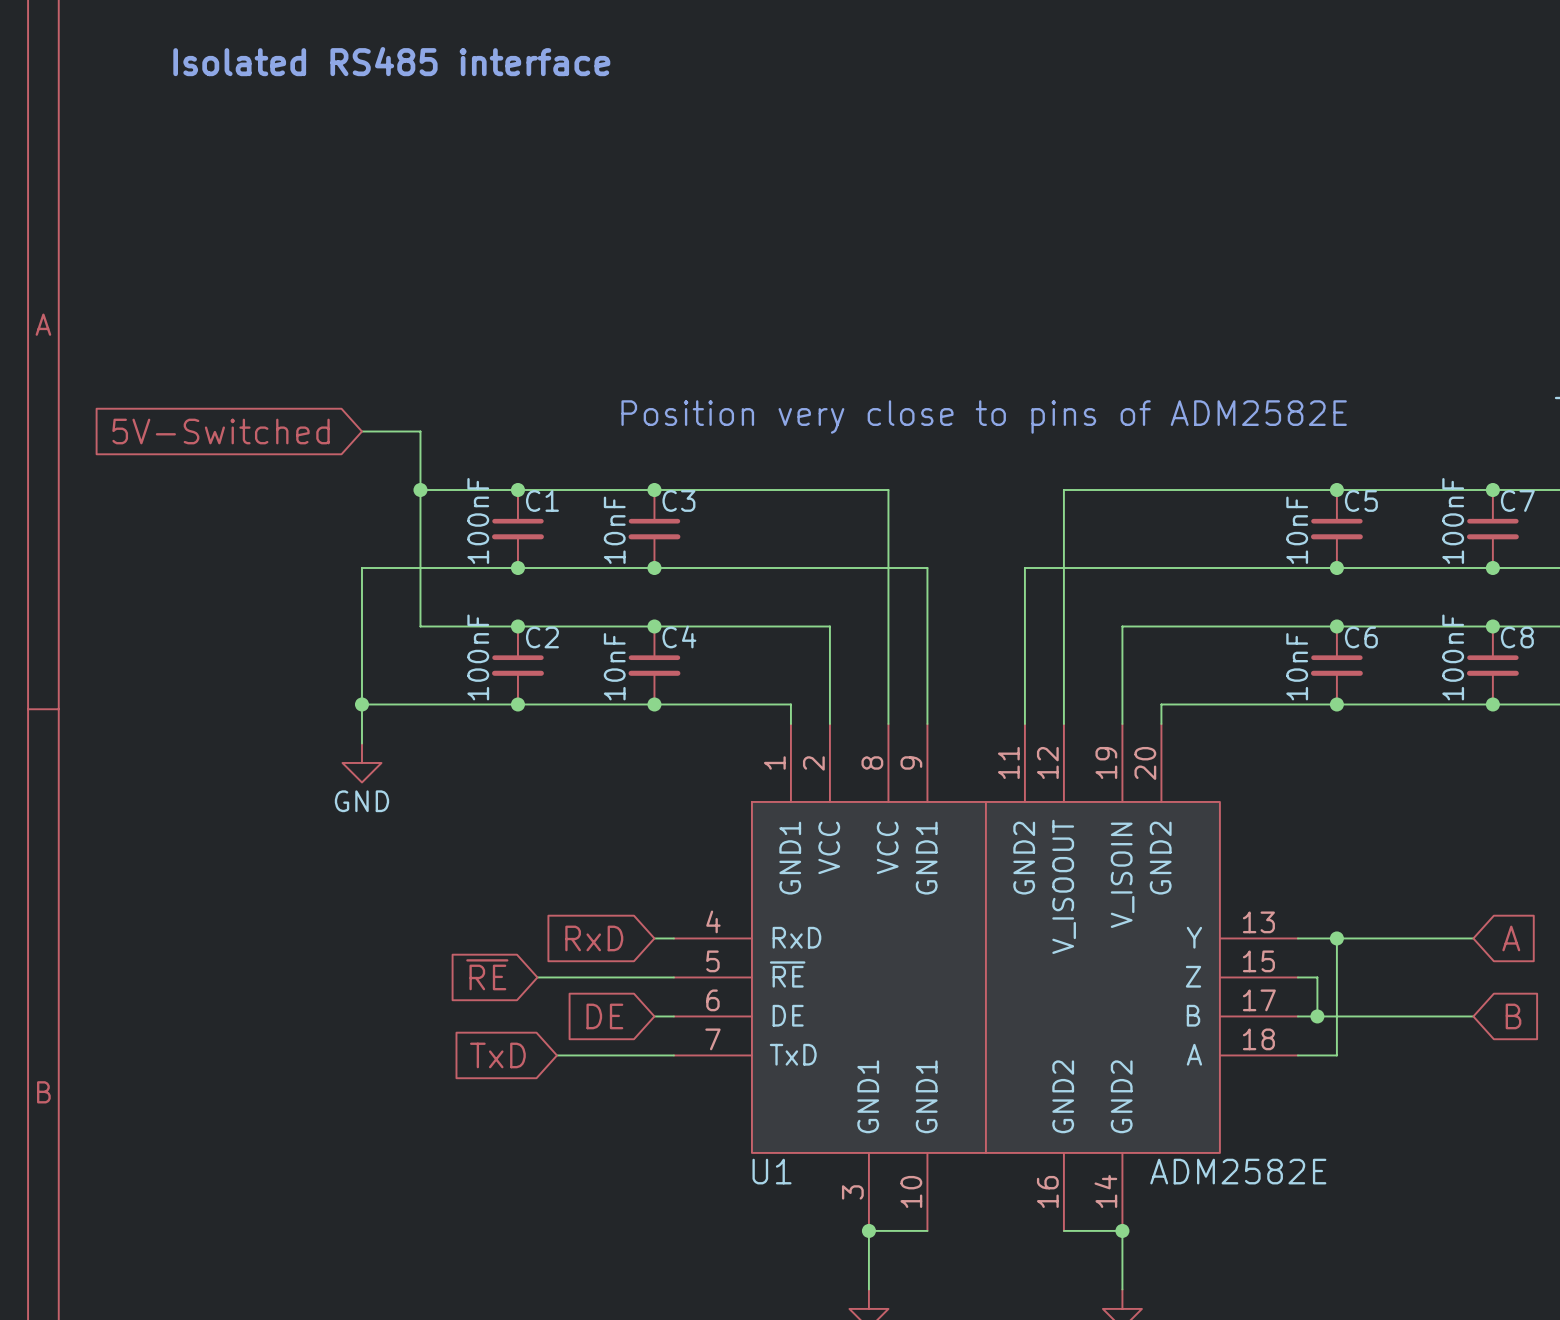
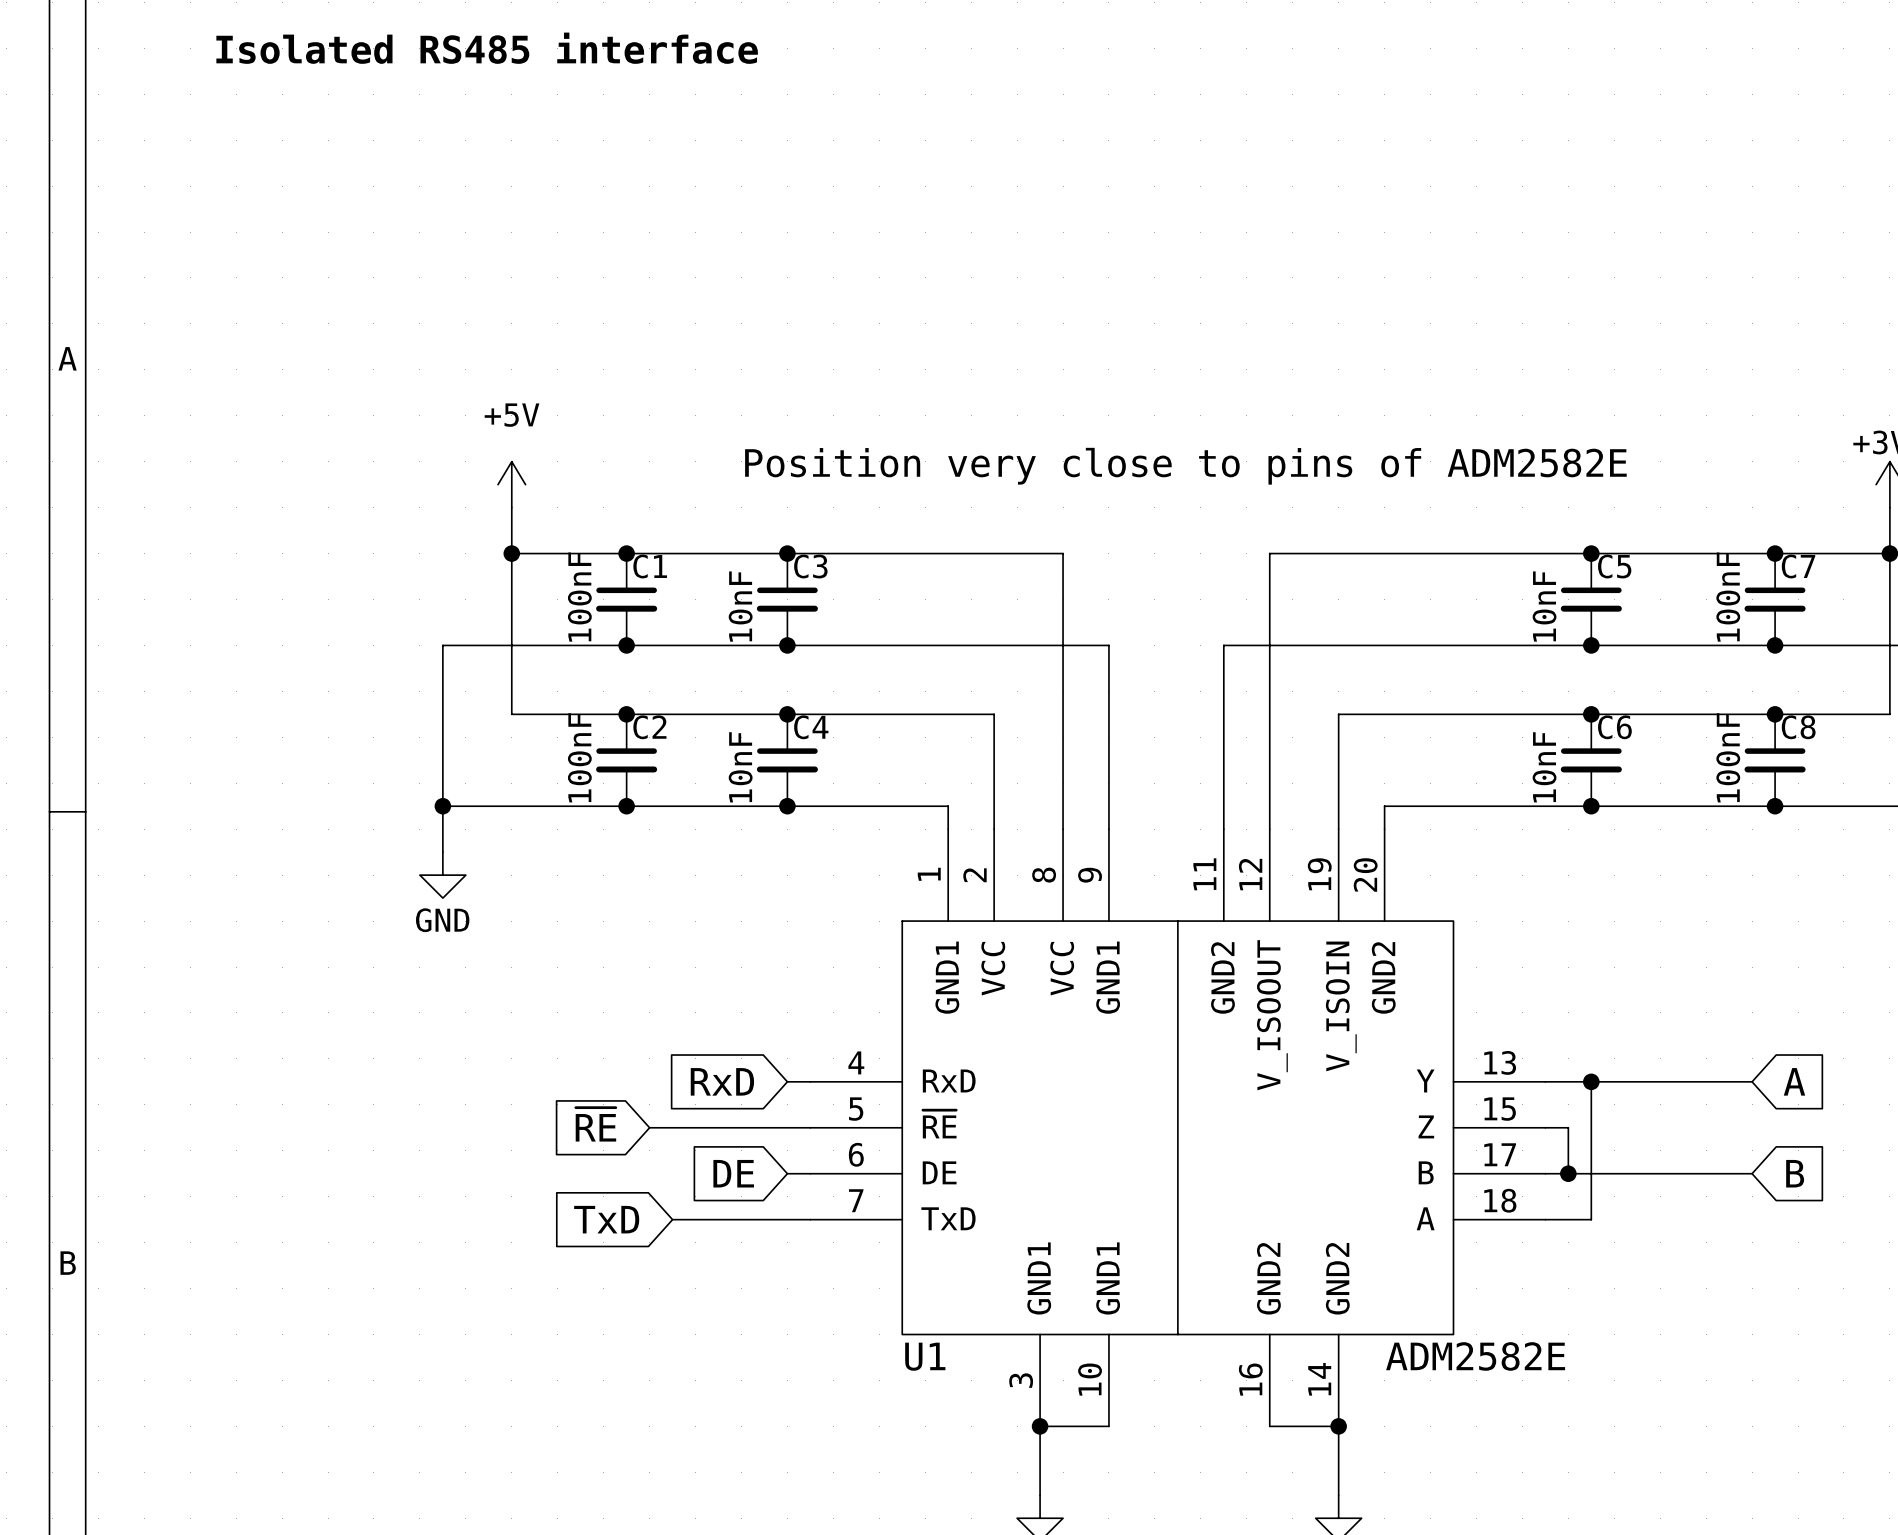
global label: 5V-Switched (221, 431) -> none
wire: (361, 431) (420, 431) (420, 451) -> none
power symbol: none -> +5V (511, 484)

